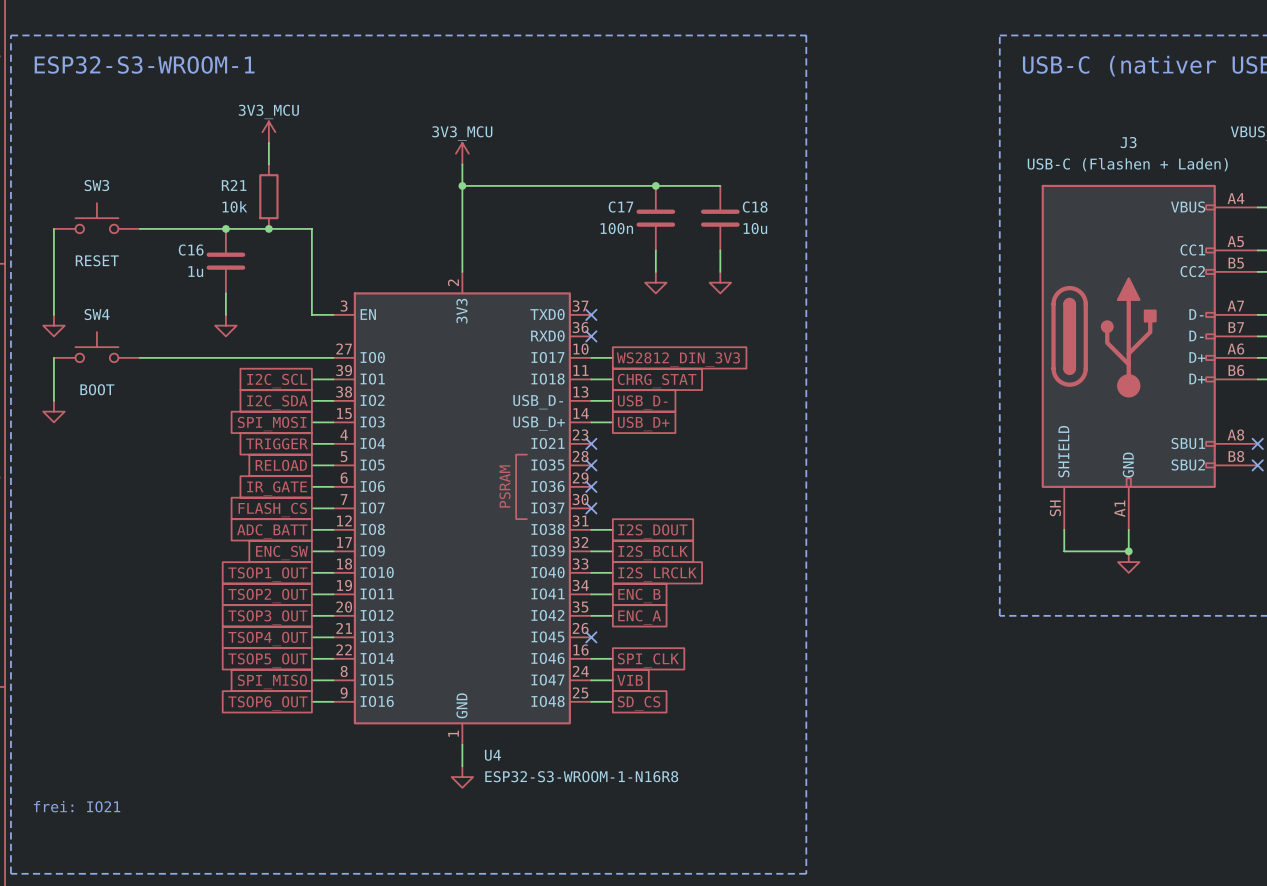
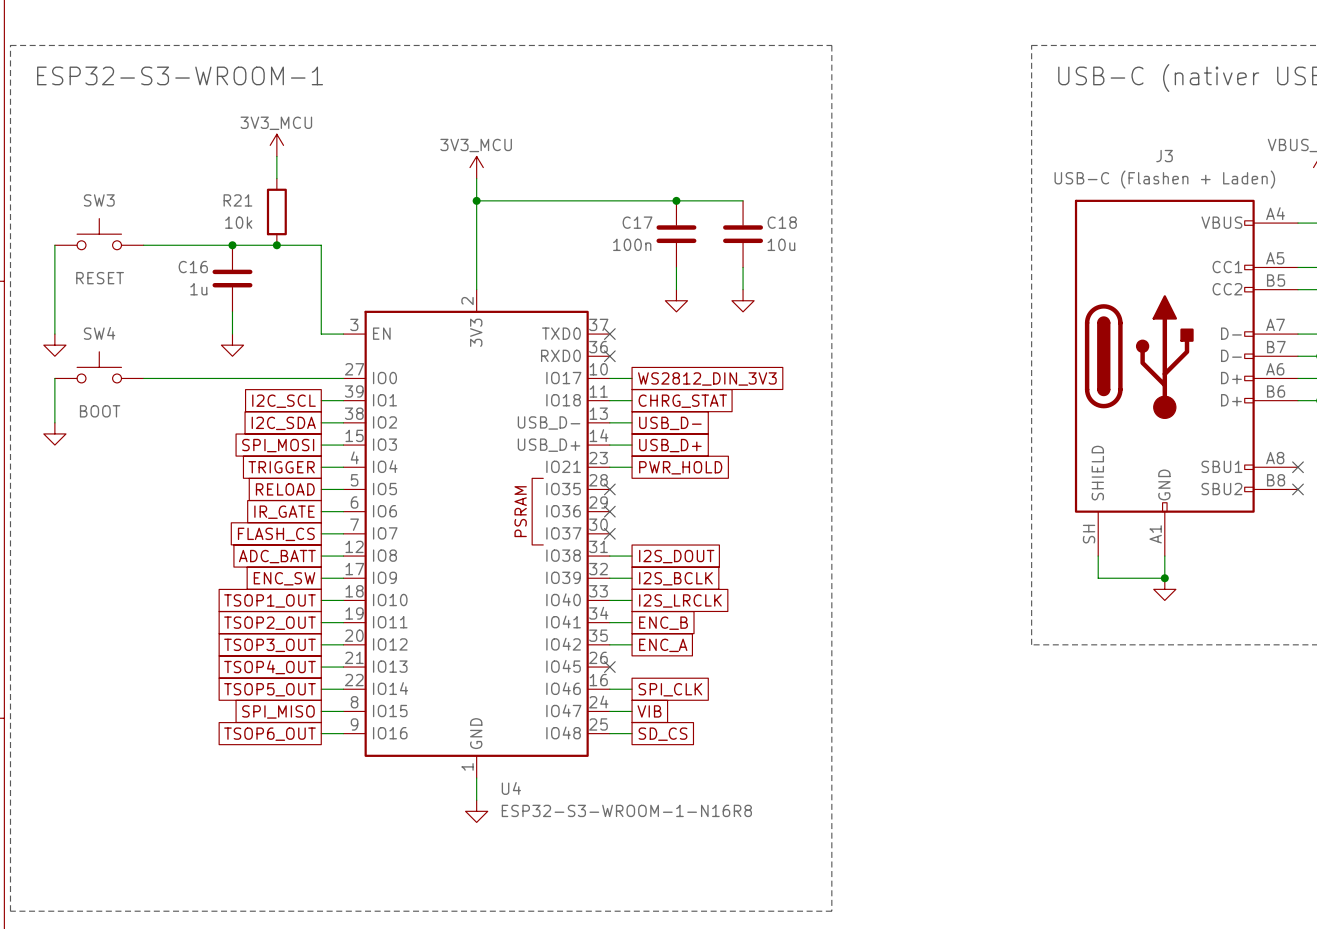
wire: none -> (609, 467) (632, 467)
no-connect mark: (591, 443) -> none
global label: none -> PWR_HOLD (680, 467)
text: frei: IO21 (77, 806) -> none

